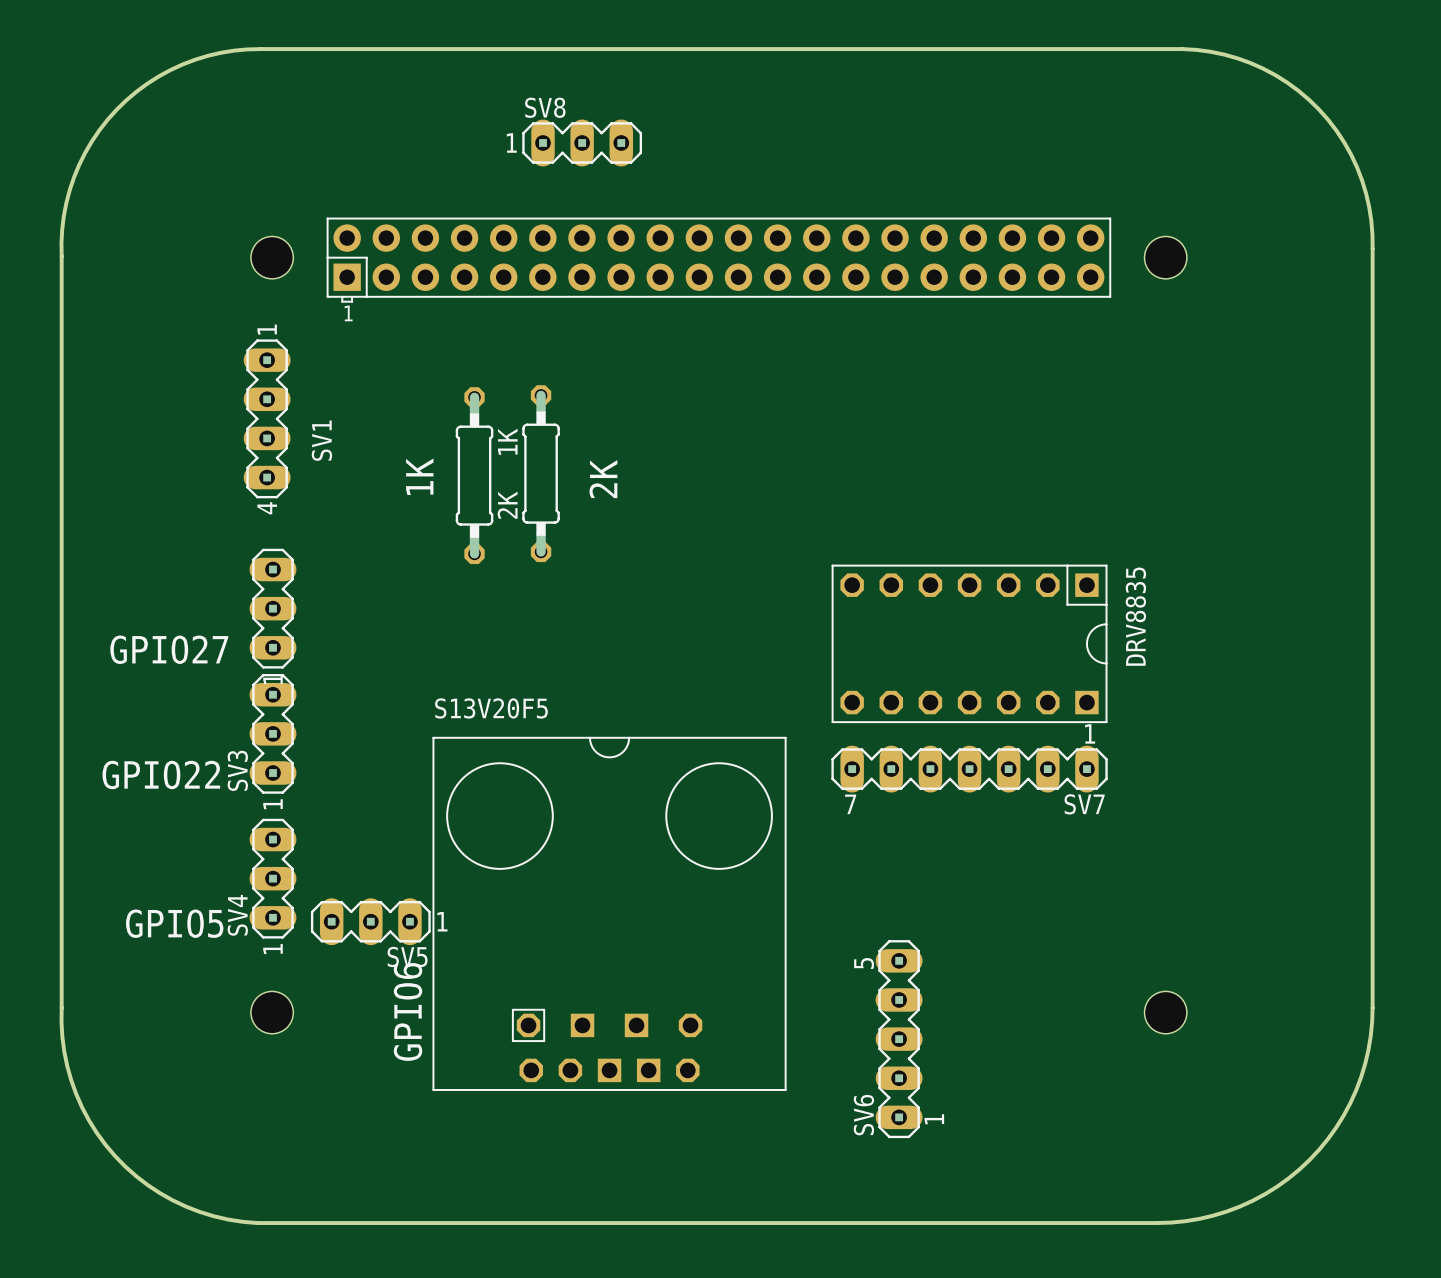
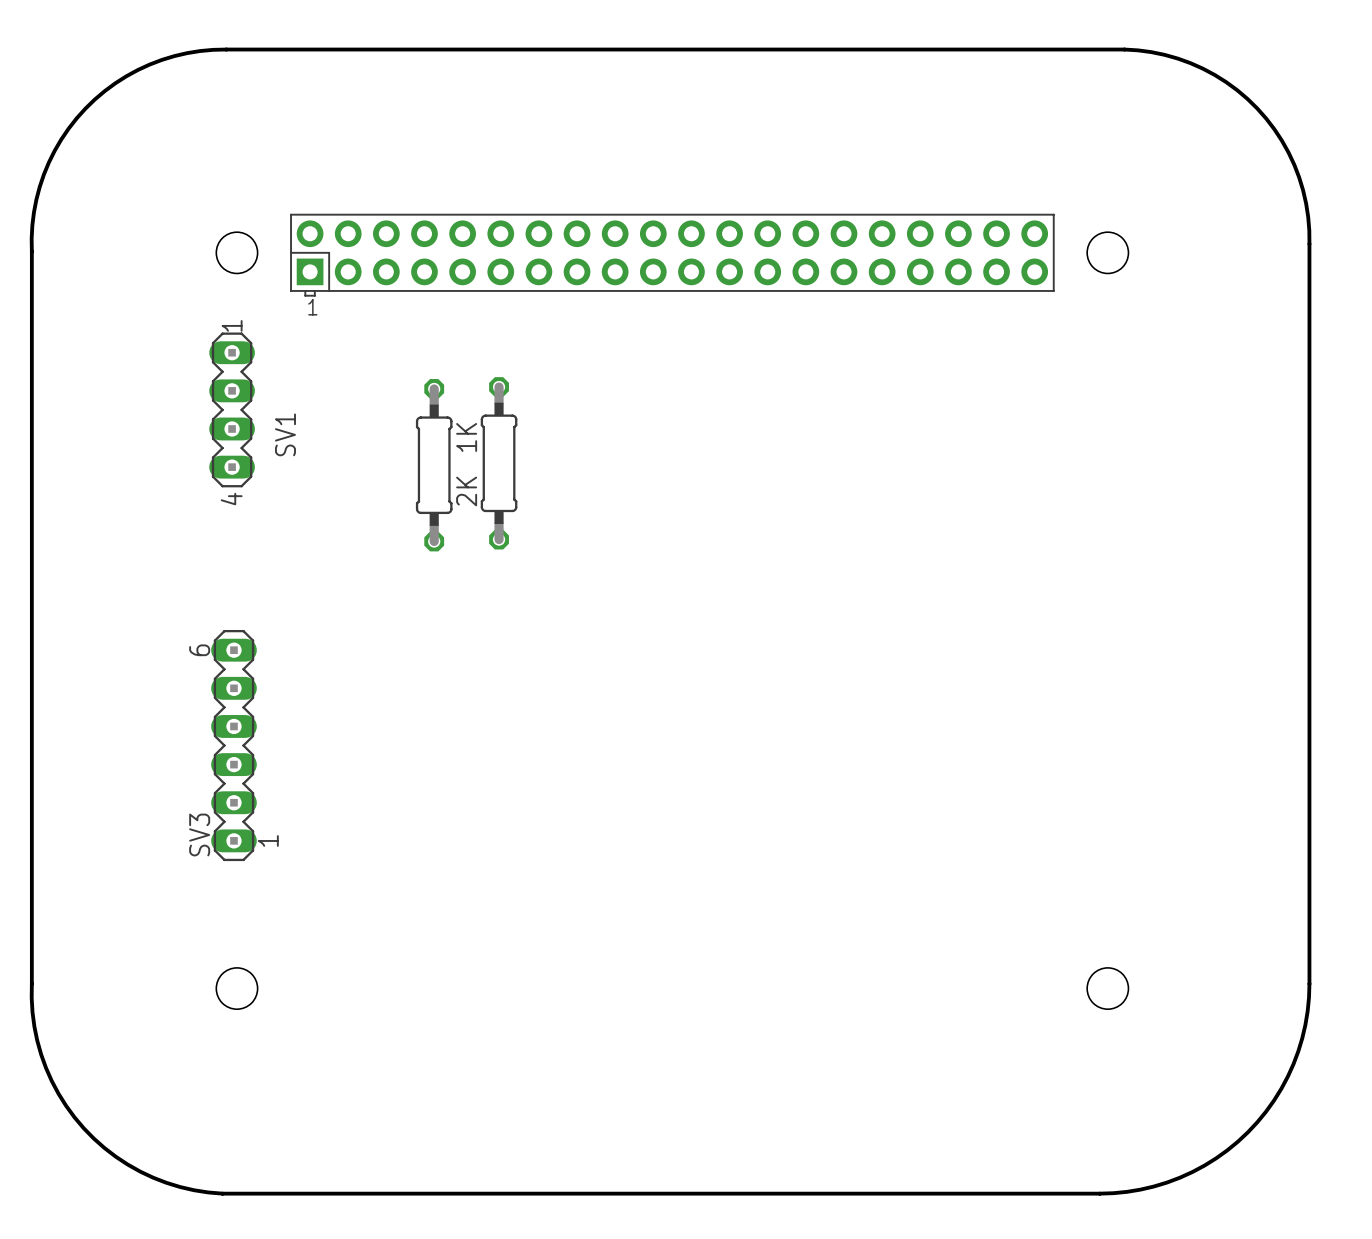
SV8: (582, 142) -> none
text: 1K (419, 476) -> none
text: 2K (603, 479) -> none
part: (273, 608) -> none
part: (969, 643) -> none
text: GPIO27 (169, 649) -> none
SV3 footprint: [249, 674, 297, 794] -> [211, 629, 257, 862]
SV7: (969, 769) -> none
SV3 name position: SV3 (237, 770) -> SV3 (199, 834)
text: GPIO22 (161, 774) -> none
SV4: (273, 878) -> none
part: (609, 913) -> none
SV5: (370, 921) -> none
text: GPIO5 (174, 923) -> none
text: GPIO6 (408, 1011) -> none
SV6: (899, 1039) -> none

